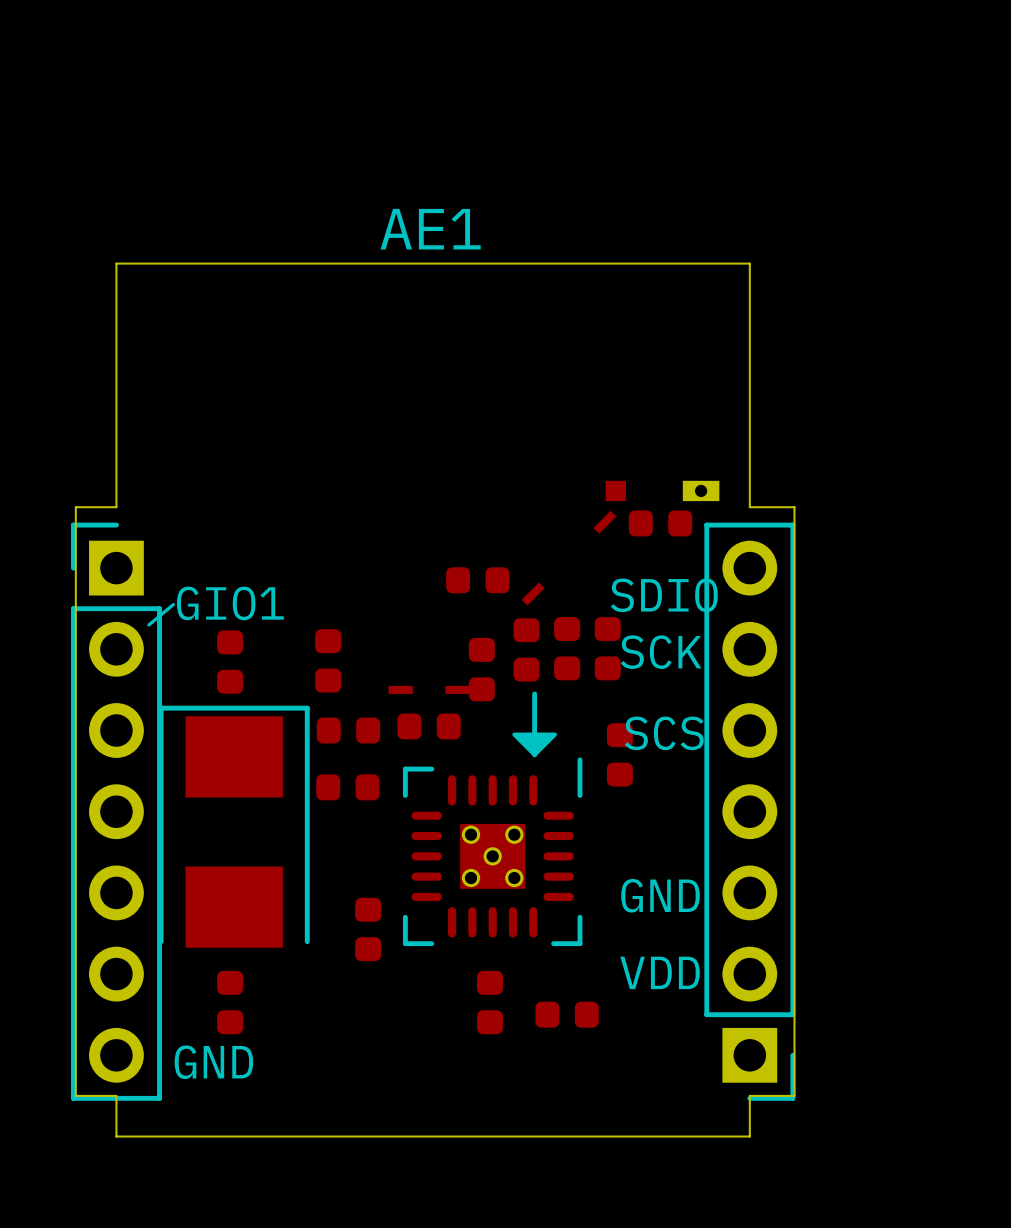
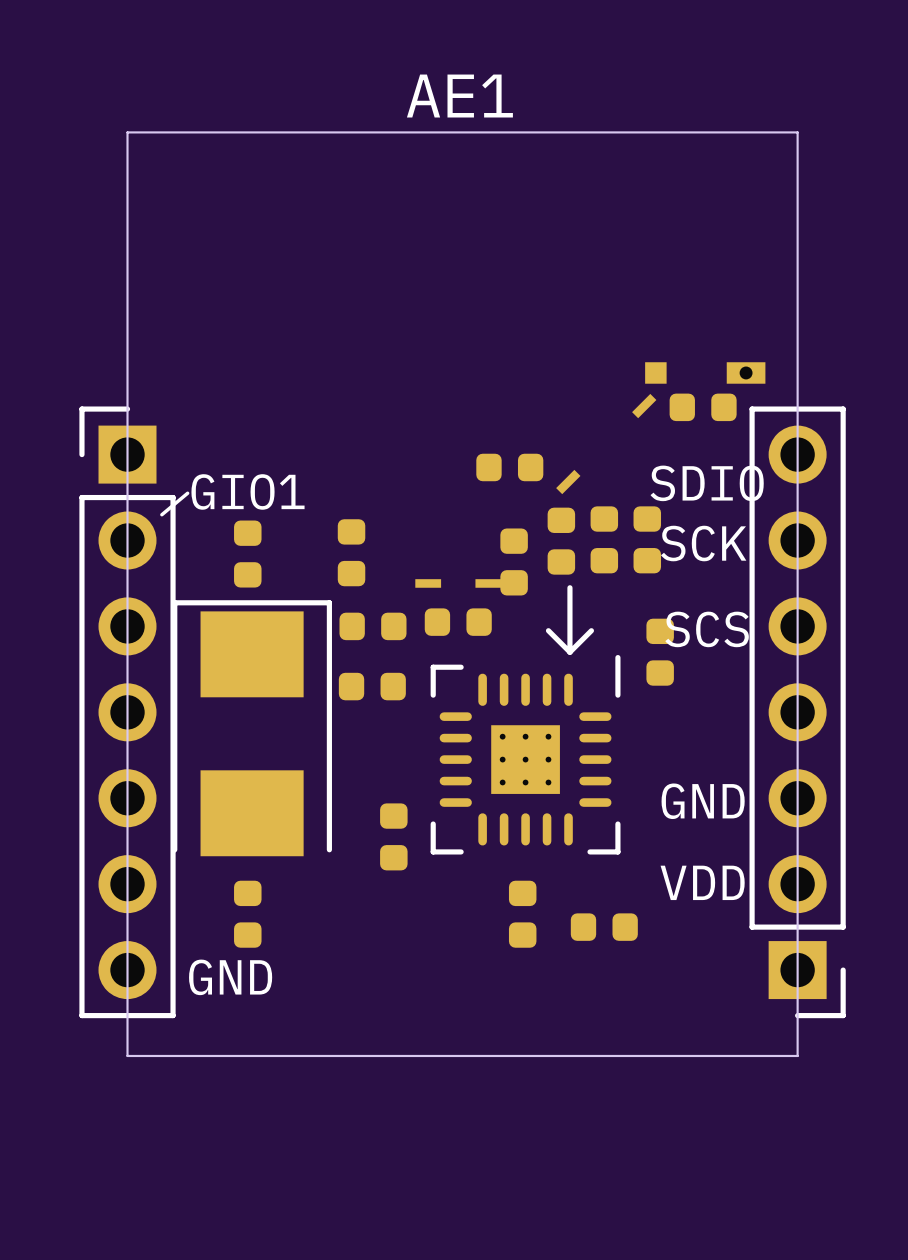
board edge: (116, 507) (75, 507) (75, 1095) (116, 1095) -> (127, 390) (127, 1013)
board edge: (749, 507) (794, 507) (794, 1095) (749, 1095) -> (797, 390) (797, 1013)
drawing: [512, 732, 557, 757] -> none
line: none -> (548, 630) (569, 652) (591, 630)
part footprint: [402, 757, 583, 947] -> [430, 654, 621, 855]

